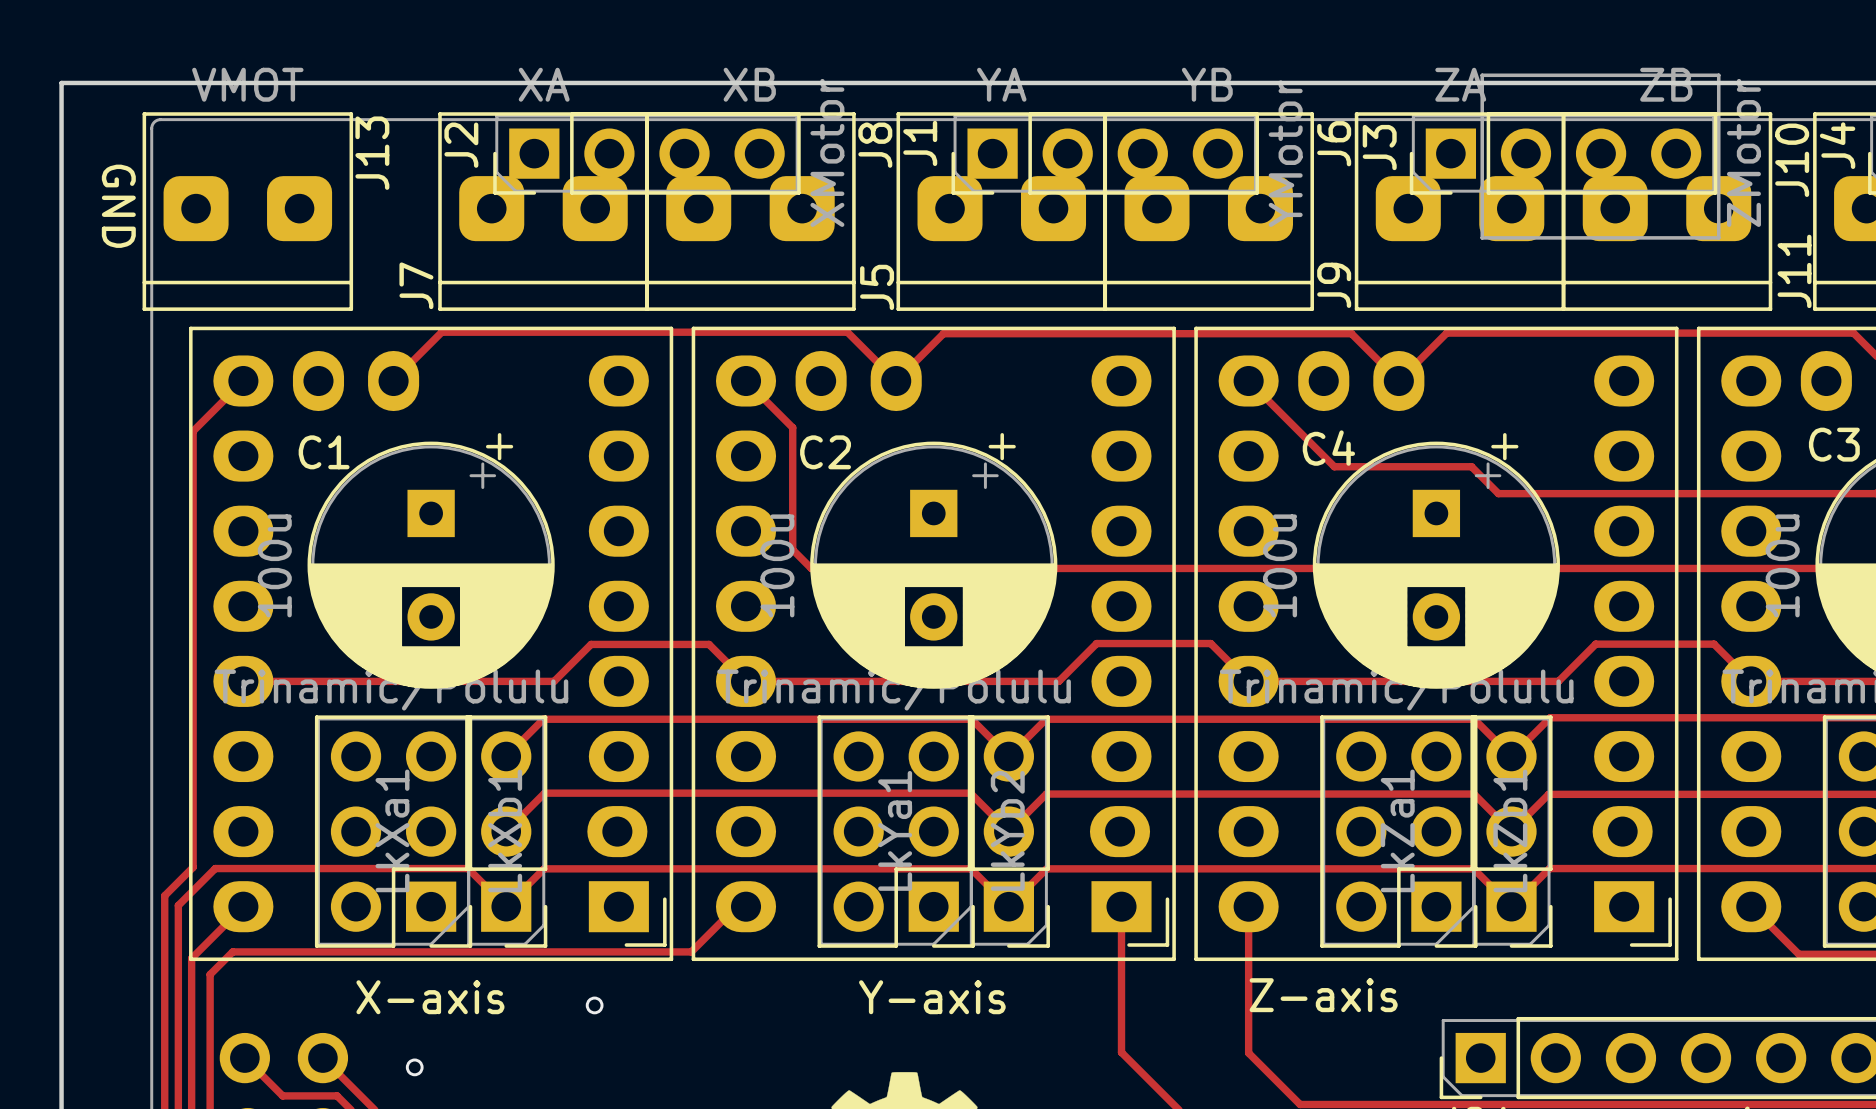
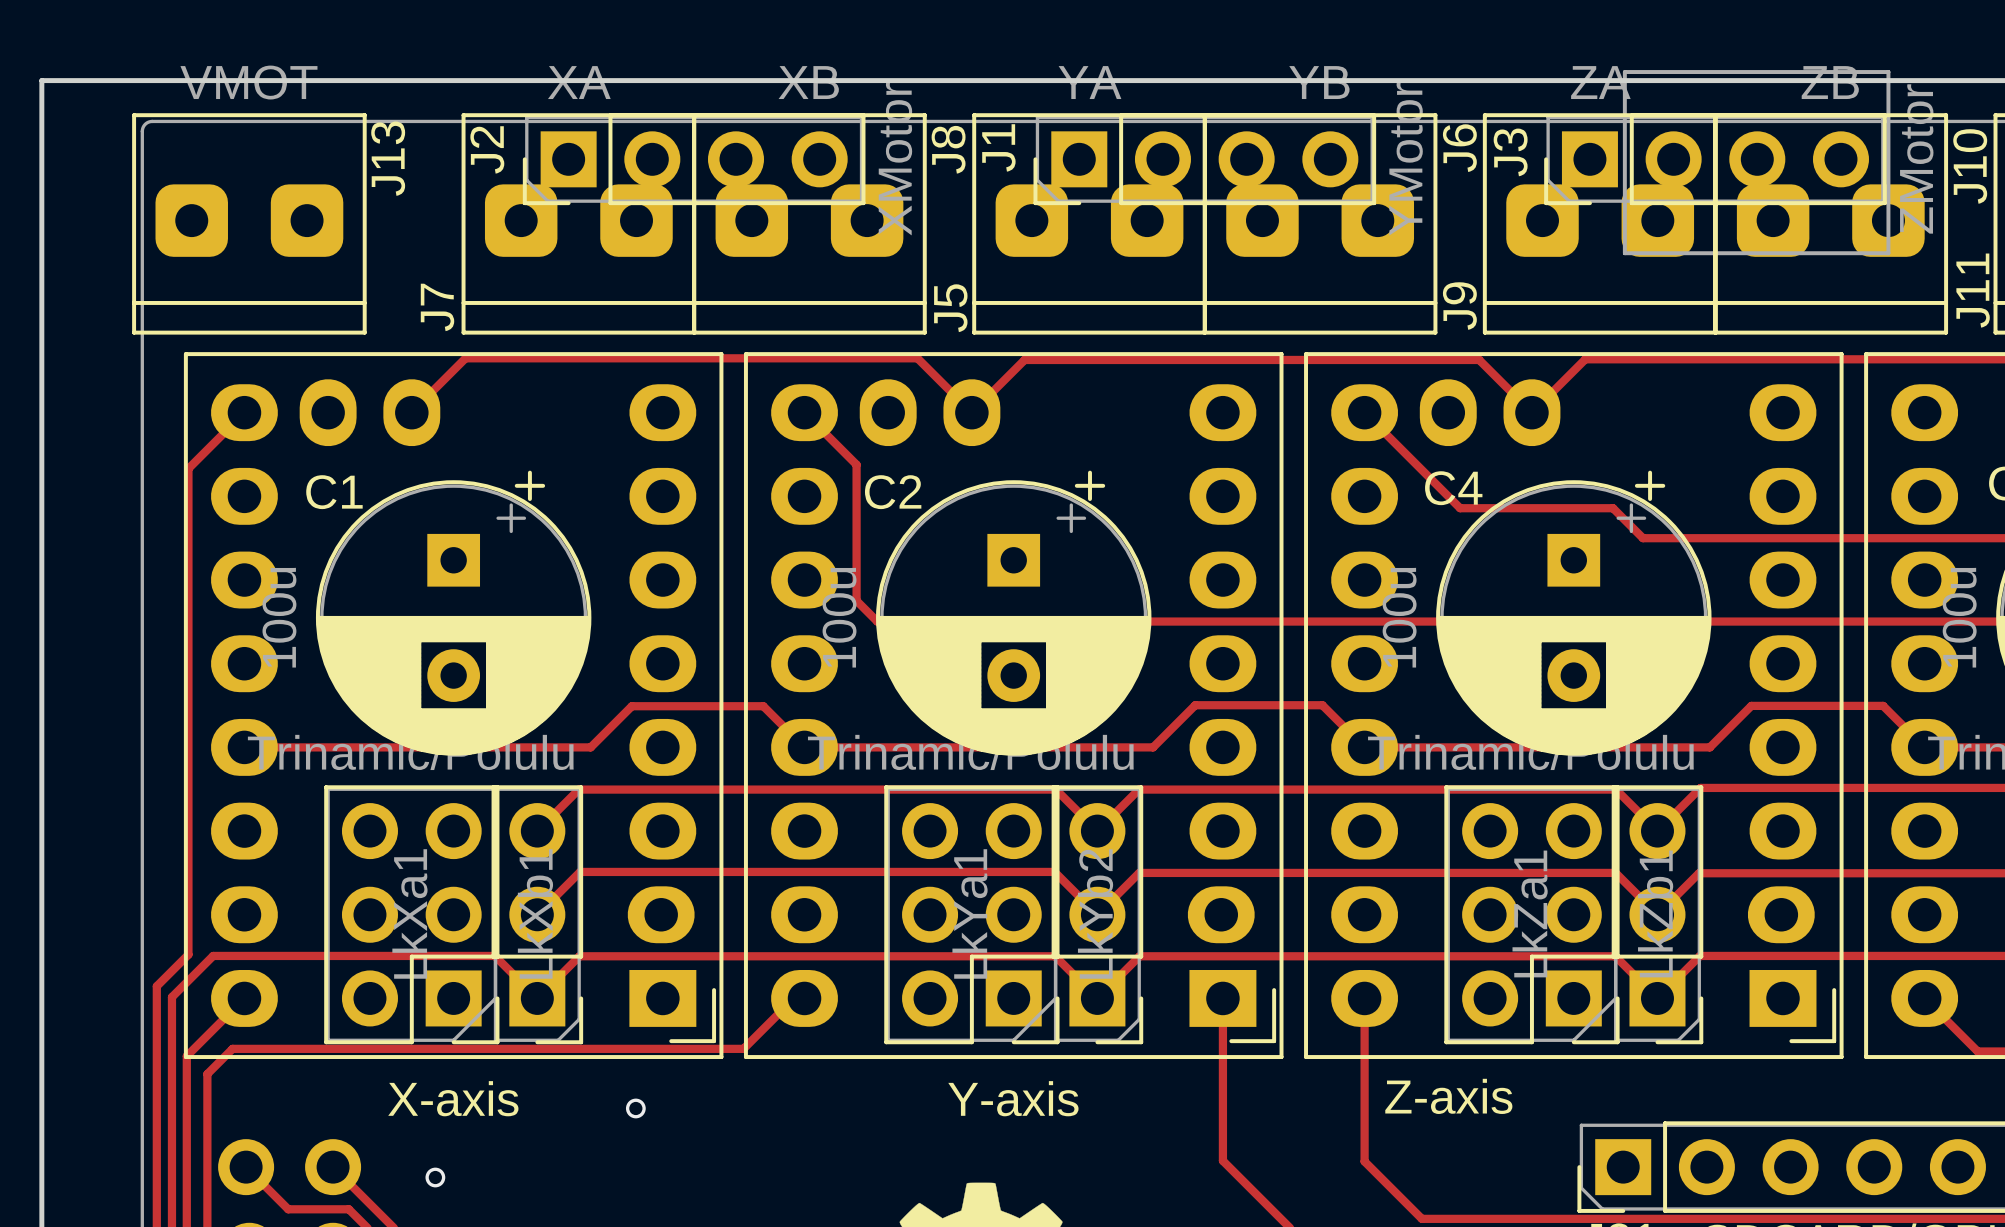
text: GND (118, 206) -> none

